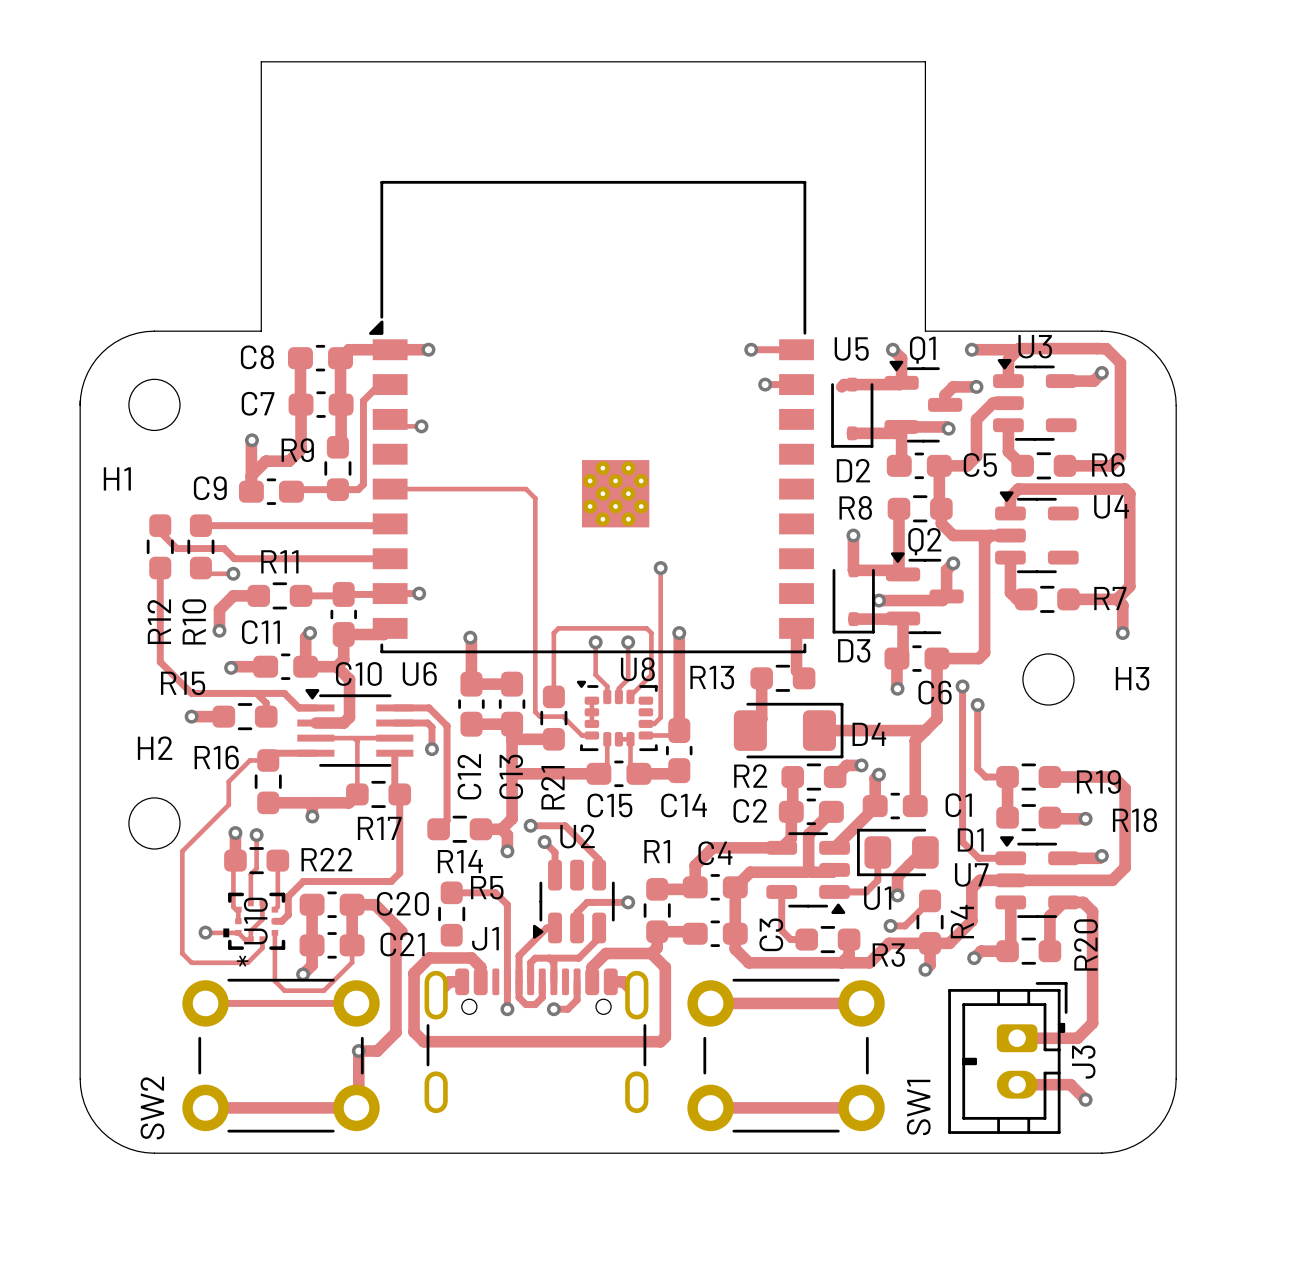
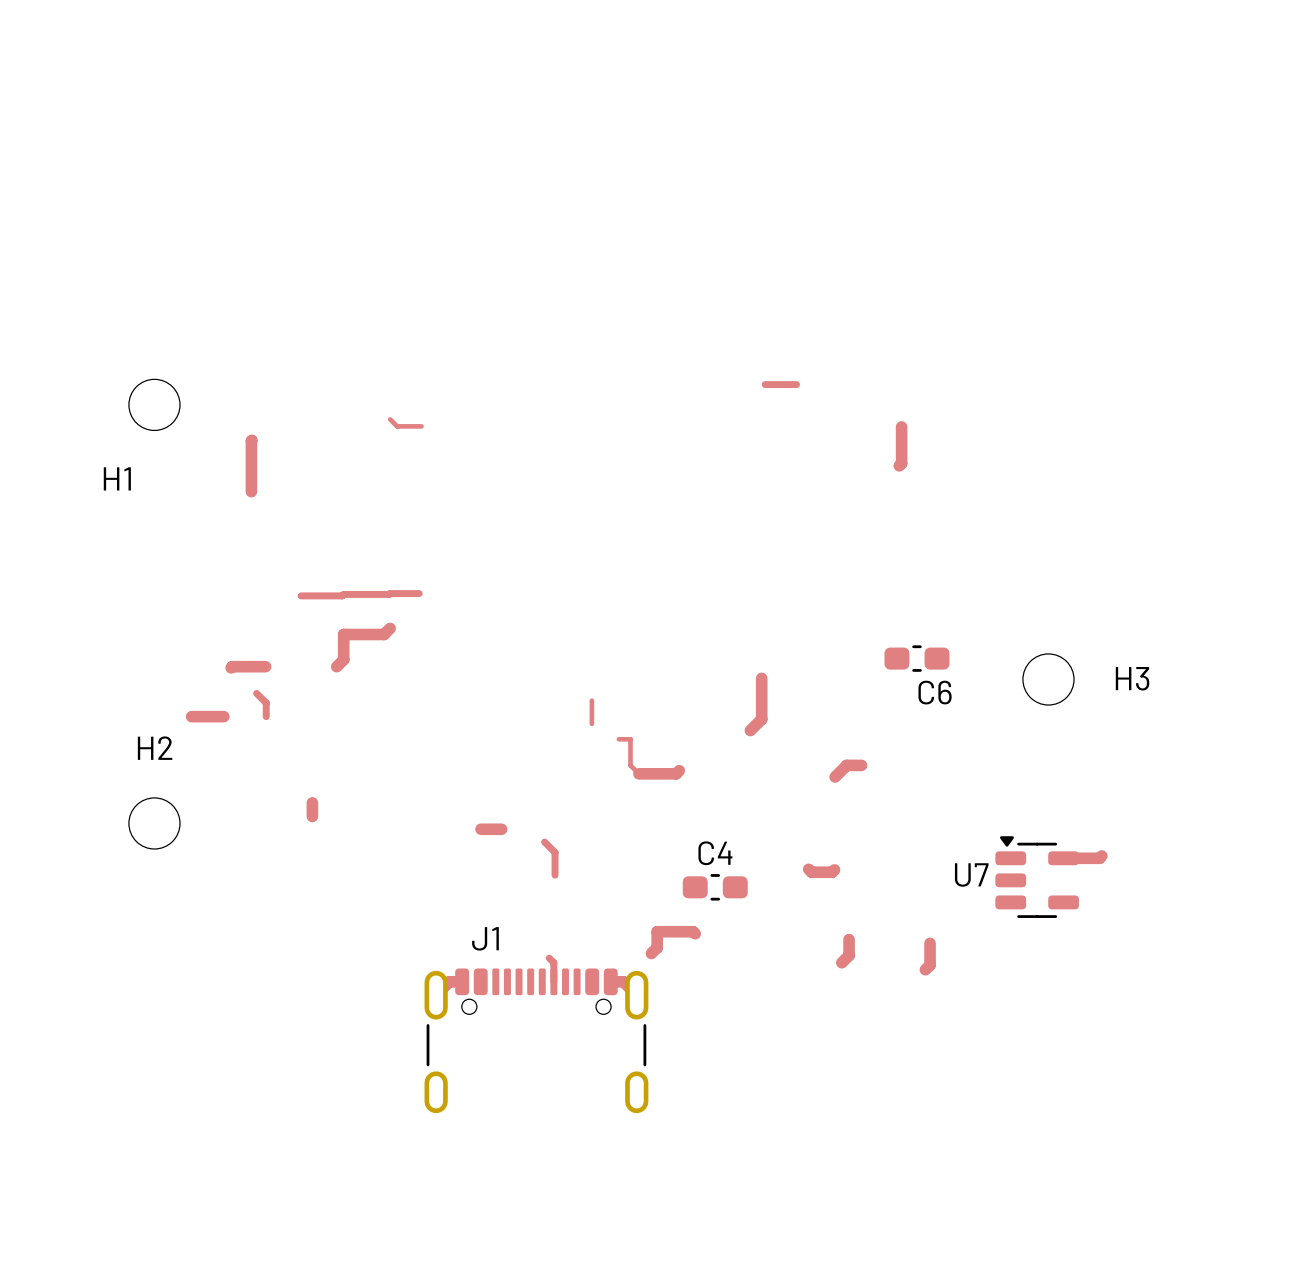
track: (428, 349) (348, 349) (340, 358) (341, 444) (337, 447) -> none
via: (428, 349) -> none
track: (751, 349) (796, 349) -> none
via: (751, 349) -> none
track: (892, 349) (901, 358) (901, 382) (899, 384) (844, 384) (841, 386) -> none
via: (892, 349) -> none
track: (971, 349) (1018, 349) -> none
via: (971, 349) -> none
track: (300, 358) (301, 449) (289, 461) (265, 461) (251, 475) -> none
C8: (320, 358) -> none
track: (1101, 372) (1093, 381) (1061, 381) -> none
via: (1101, 372) -> none
track: (1008, 381) (1008, 359) (1019, 348) (1106, 348) (1120, 362) (1120, 456) (1111, 465) (1065, 465) -> none
track: (390, 384) (379, 384) (363, 400) (363, 484) (358, 489) (293, 489) (291, 491) -> none
via: (765, 384) -> none
track: (976, 386) (953, 386) (945, 395) (945, 404) -> none
via: (976, 386) -> none
U3: (1034, 399) -> none
board edge: (80, 400) (80, 1078) (82, 1095) (87, 1111) (101, 1131) (114, 1141) (137, 1151) (154, 1153) (1101, 1153) (1126, 1149) (1141, 1141) (1154, 1131) (1164, 1118) (1174, 1095) (1176, 1078) (1176, 405) (1174, 388) (1164, 365) (1154, 352) (1134, 338) (1118, 333) (1101, 331) (925, 331) (925, 61) (261, 61) (261, 331) (154, 331) (129, 335) (114, 342) (96, 359) (84, 380) (80, 397) (80, 405) -> none
Q1: (923, 401) -> none
track: (1008, 403) (993, 403) (976, 419) (976, 456) (967, 465) (939, 465) (939, 506) (941, 508) (941, 523) (953, 535) (1010, 535) -> none
C7: (321, 404) -> none
D2: (852, 412) -> none
U5: (591, 417) -> none
track: (1008, 425) (1008, 451) (1022, 465) -> none
via: (421, 426) -> none
track: (948, 428) (946, 426) (901, 426) (895, 433) (852, 433) -> none
via: (948, 428) -> none
via: (251, 440) -> none
C5: (919, 465) -> none
R6: (1043, 465) -> none
R9: (337, 468) -> none
track: (390, 489) (526, 489) (535, 498) (535, 712) (539, 716) (563, 716) (582, 735) (591, 735) -> none
C9: (271, 491) -> none
track: (898, 508) (898, 570) -> none
R8: (920, 508) -> none
track: (1010, 513) (1010, 496) (1018, 489) (1125, 489) (1129, 493) (1129, 586) (1116, 599) -> none
track: (390, 523) (388, 525) (200, 525) -> none
track: (160, 525) (160, 532) (176, 548) (224, 548) (234, 558) (390, 558) -> none
U4: (1036, 532) -> none
track: (853, 535) (853, 570) -> none
via: (853, 535) -> none
track: (990, 535) (984, 541) (984, 652) (978, 658) (937, 658) (937, 718) (915, 740) (915, 806) -> none
R12: (160, 546) -> none
R10: (200, 546) -> none
track: (1010, 557) (1010, 592) (1017, 599) (1026, 599) -> none
track: (953, 563) (946, 570) (946, 596) (942, 600) (878, 600) -> none
via: (953, 563) -> none
track: (160, 568) (160, 662) (191, 693) (284, 693) (299, 707) (315, 707) -> none
track: (200, 568) (206, 573) (233, 573) -> none
track: (660, 568) (660, 717) (654, 723) (645, 723) -> none
via: (660, 568) -> none
track: (853, 570) (898, 570) -> none
via: (233, 573) -> none
via: (419, 593) -> none
Q2: (924, 593) -> none
track: (258, 595) (233, 595) (219, 609) (219, 630) -> none
R11: (279, 595) -> none
D3: (853, 598) -> none
R7: (1047, 599) -> none
track: (1068, 599) (1116, 599) -> none
track: (1116, 599) (1122, 605) (1122, 633) -> none
via: (878, 600) -> none
C10: (343, 614) -> none
track: (853, 619) (903, 618) (903, 652) (896, 658) (897, 688) -> none
track: (796, 628) (796, 670) (804, 678) -> none
via: (219, 630) -> none
track: (310, 633) (305, 637) (305, 666) (336, 666) (349, 679) (349, 717) (343, 723) (315, 723) -> none
via: (310, 633) -> none
track: (679, 633) (679, 730) (674, 735) (645, 735) -> none
via: (679, 633) -> none
via: (1122, 633) -> none
track: (470, 637) (471, 684) (512, 684) -> none
via: (470, 637) -> none
track: (595, 642) (595, 674) (607, 686) (607, 696) -> none
via: (595, 642) -> none
track: (628, 642) (628, 679) (618, 688) (618, 696) -> none
via: (628, 642) -> none
C11: (285, 666) -> none
via: (231, 667) -> none
R13: (782, 678) -> none
track: (962, 686) (962, 842) (978, 858) (1010, 858) -> none
via: (962, 686) -> none
via: (897, 688) -> none
track: (553, 696) (553, 633) (558, 628) (646, 628) (651, 633) (651, 675) (630, 696) -> none
C12: (471, 704) -> none
C13: (512, 704) -> none
track: (977, 705) (977, 768) (985, 777) (1007, 777) (1007, 817) -> none
via: (977, 705) -> none
track: (394, 707) (429, 707) (447, 725) (447, 820) (438, 829) -> none
U8: (617, 715) -> none
via: (191, 716) -> none
R15: (245, 716) -> none
R21: (553, 718) -> none
track: (394, 723) (427, 723) (431, 727) (431, 749) -> none
track: (471, 724) (512, 724) (512, 818) (501, 829) (507, 835) (507, 851) -> none
U6: (355, 727) -> none
D4: (788, 730) -> none
track: (819, 730) (925, 730) -> none
track: (315, 738) (394, 738) -> none
track: (354, 738) (357, 741) (357, 794) (348, 802) (268, 802) -> none
track: (553, 739) (512, 739) -> none
track: (607, 739) (607, 765) (598, 773) (512, 772) -> none
via: (431, 749) -> none
C14: (679, 750) -> none
track: (315, 753) (275, 753) (268, 760) (249, 760) (228, 781) (228, 804) (182, 851) (182, 953) (191, 962) (247, 962) (262, 948) (262, 939) -> none
track: (394, 753) (394, 789) (399, 794) (399, 873) (391, 881) (303, 881) (288, 896) (288, 914) (281, 921) (274, 921) -> none
via: (861, 765) -> none
C15: (618, 773) -> none
track: (878, 774) (875, 778) (875, 807) (834, 847) -> none
via: (878, 774) -> none
track: (792, 777) (791, 838) (781, 847) (712, 847) (695, 865) (695, 887) (693, 889) (657, 889) -> none
R2: (813, 777) -> none
R19: (1028, 777) -> none
track: (1049, 777) (1113, 777) (1125, 788) (1125, 867) (1112, 880) (979, 880) (971, 888) (971, 920) (949, 943) (889, 943) (869, 962) (748, 962) (735, 949) (735, 887) (750, 872) (805, 872) (808, 869) (808, 834) (831, 811) -> none
R16: (268, 781) -> none
R17: (378, 794) -> none
C1: (895, 806) -> none
C2: (811, 811) -> none
via: (312, 816) -> none
R18: (1028, 817) -> none
track: (1049, 817) (1085, 818) -> none
via: (1085, 818) -> none
track: (530, 825) (565, 825) (599, 859) (599, 875) -> none
via: (530, 825) -> none
R14: (459, 829) -> none
track: (235, 833) (233, 907) (238, 909) (238, 921) -> none
via: (235, 833) -> none
track: (256, 835) (256, 868) (250, 874) (250, 902) -> none
via: (256, 835) -> none
via: (544, 842) -> none
via: (507, 851) -> none
track: (877, 852) (877, 880) (866, 891) (834, 891) -> none
D1: (897, 852) -> none
track: (925, 852) (921, 852) (897, 876) (897, 895) -> none
via: (1101, 855) -> none
R22: (256, 860) -> none
track: (277, 860) (277, 906) (274, 909) -> none
U1: (808, 873) -> none
track: (781, 891) (781, 930) (790, 939) (806, 939) -> none
track: (451, 892) (495, 892) (507, 904) (507, 1009) -> none
via: (897, 895) -> none
track: (930, 900) (905, 925) (890, 925) -> none
U2: (573, 901) -> none
track: (262, 902) (262, 919) (250, 931) (250, 939) (245, 939) (238, 932) (205, 932) -> none
track: (628, 902) (587, 902) (577, 912) (577, 927) -> none
via: (628, 902) -> none
track: (1010, 902) (1010, 947) (1007, 951) (981, 951) (974, 958) -> none
track: (312, 904) (312, 965) (303, 974) -> none
C20: (332, 904) -> none
R1: (657, 910) -> none
R5: (451, 914) -> none
U10: (254, 921) -> none
R4: (930, 922) -> none
track: (395, 925) (395, 1032) (377, 1051) (358, 1051) (358, 1105) (356, 1107) (203, 1106) -> none
via: (890, 925) -> none
track: (555, 927) (546, 927) (519, 955) (519, 997) (526, 1004) (535, 1004) (542, 997) (542, 981) -> none
track: (599, 927) (599, 937) (578, 958) (535, 958) (530, 962) (530, 981) -> none
track: (402, 931) (375, 904) (352, 904) (352, 962) (323, 990) (284, 990) (274, 981) (274, 932) -> none
via: (205, 932) -> none
C3: (715, 933) -> none
R3: (827, 939) -> none
C21: (332, 945) -> none
R20: (1028, 951) -> none
track: (1049, 951) (1049, 916) (1063, 902) (1083, 902) (1092, 911) (1092, 1023) (1077, 1038) (1017, 1038) -> none
via: (974, 958) -> none
via: (925, 969) -> none
via: (303, 974) -> none
track: (480, 981) (480, 967) (471, 958) (429, 958) (414, 973) (414, 1031) (423, 1041) (660, 1041) (665, 1037) (665, 967) (651, 953) (605, 953) (592, 967) (592, 981) -> none
track: (577, 981) (577, 999) (567, 1009) (553, 1009) -> none
track: (205, 1003) (356, 1003) -> none
track: (710, 1003) (861, 1003) -> none
via: (507, 1009) -> none
via: (553, 1009) -> none
via: (358, 1051) -> none
SW2: (281, 1055) -> none
SW1: (786, 1055) -> none
J3: (1007, 1057) -> none
track: (1017, 1084) (1070, 1084) (1085, 1099) -> none
via: (1085, 1099) -> none
track: (710, 1107) (861, 1107) -> none

